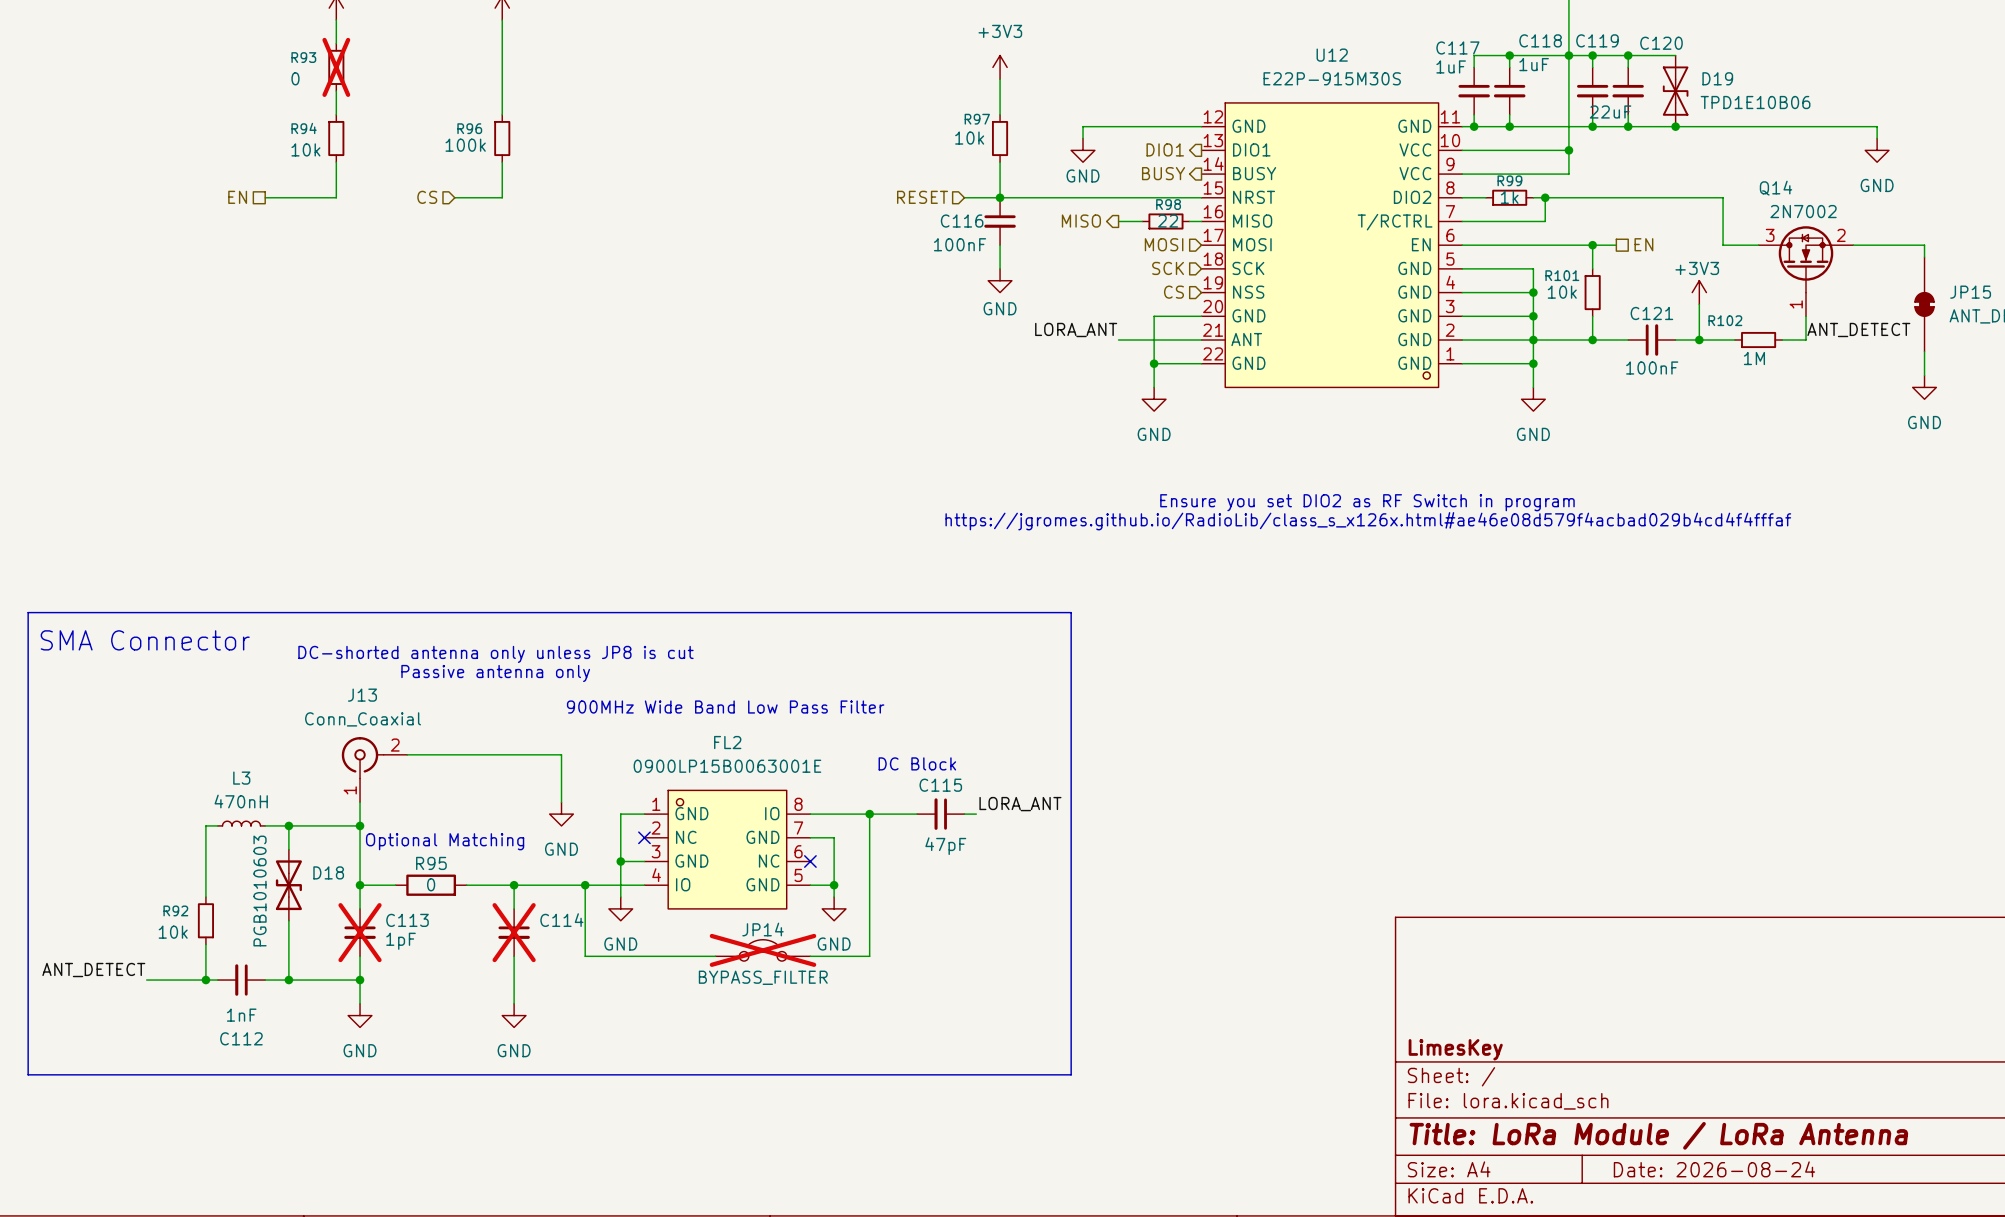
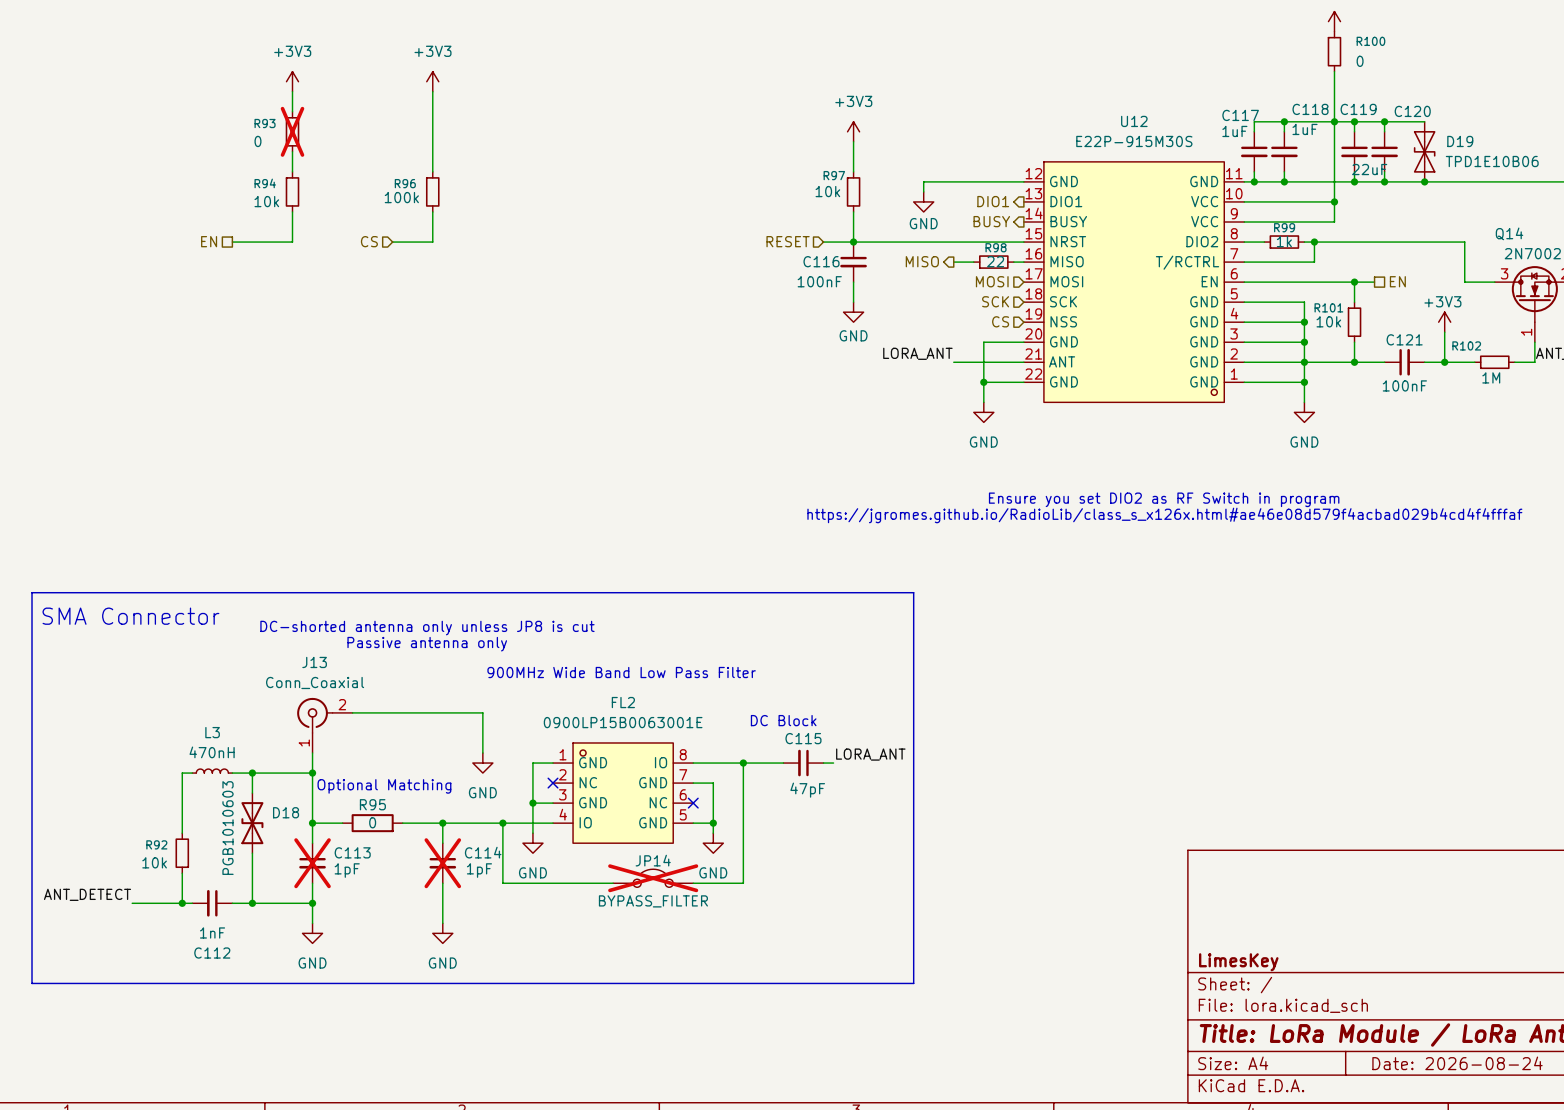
C114 value: none -> 1pF (479, 870)

